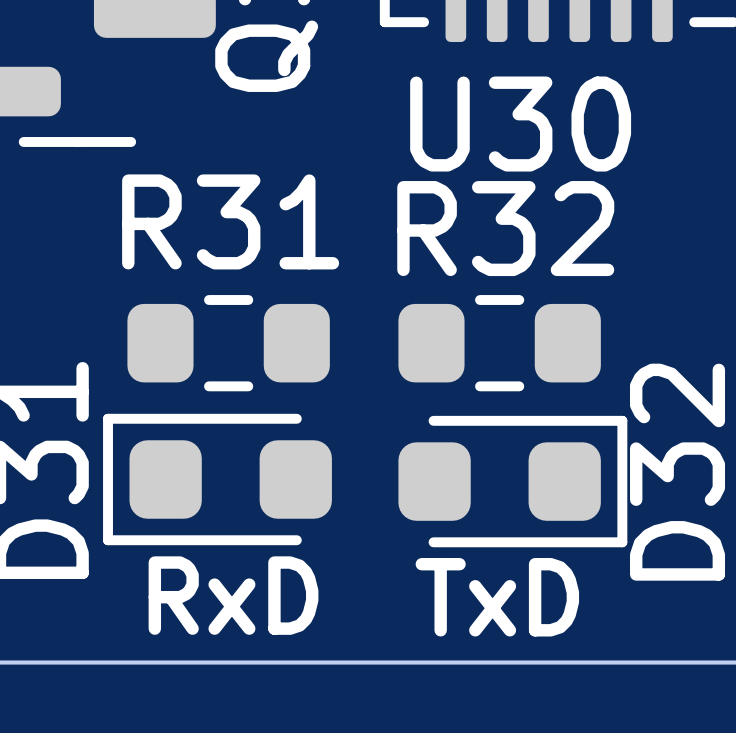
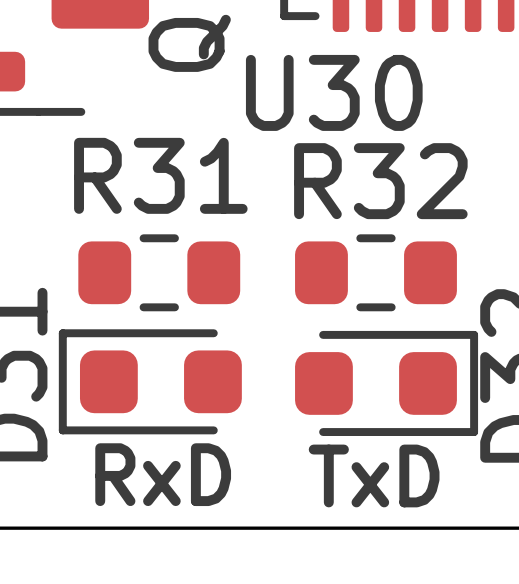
U30 name position: U30 (520, 124) -> U30 (334, 92)

